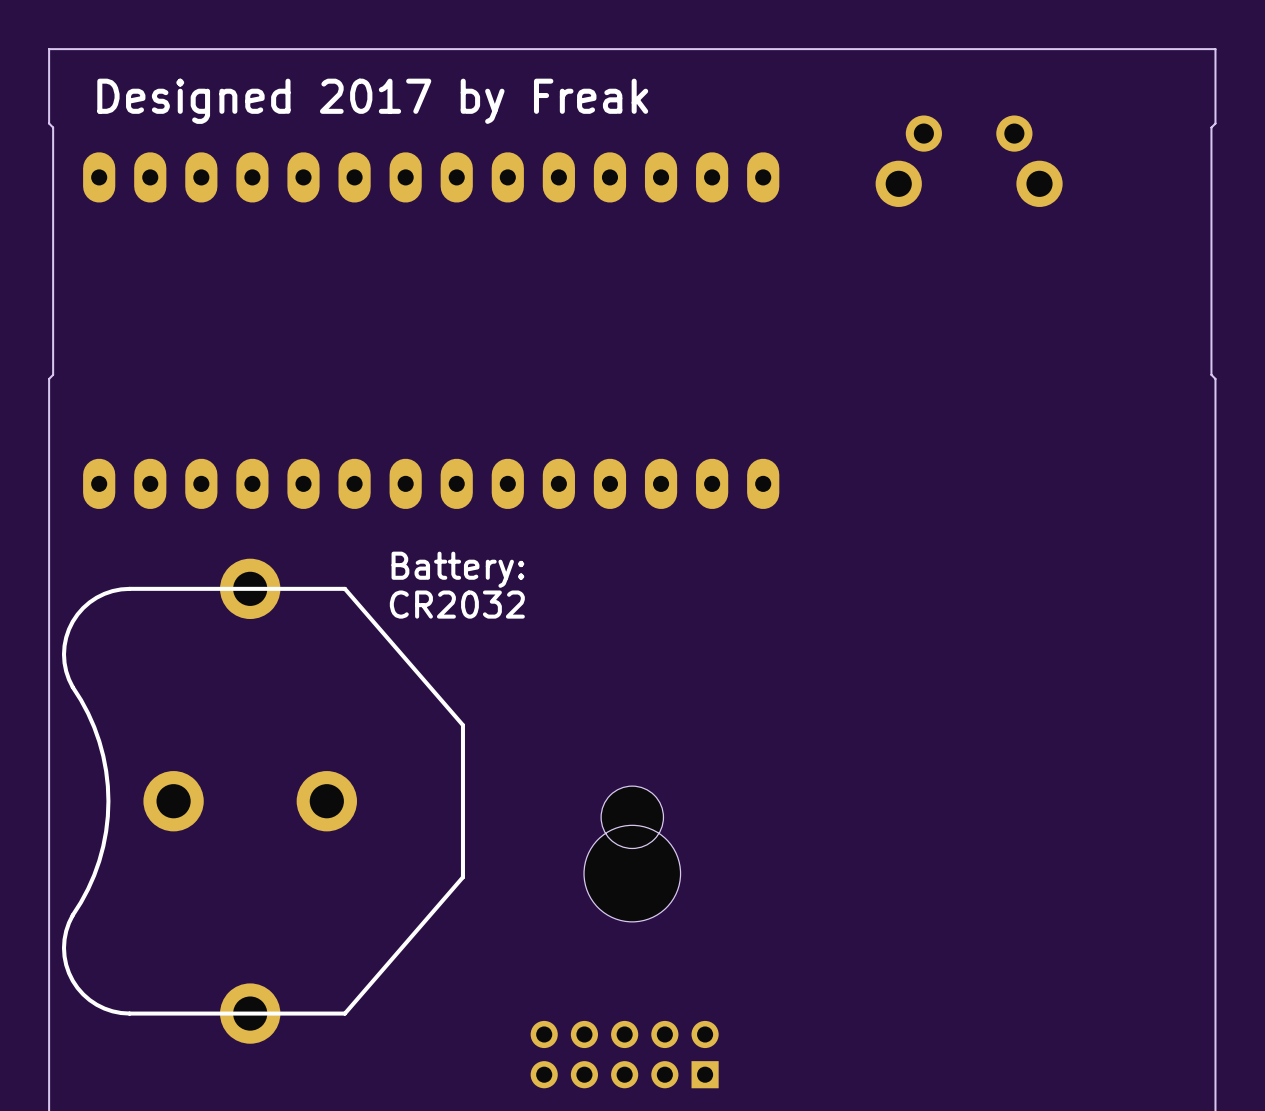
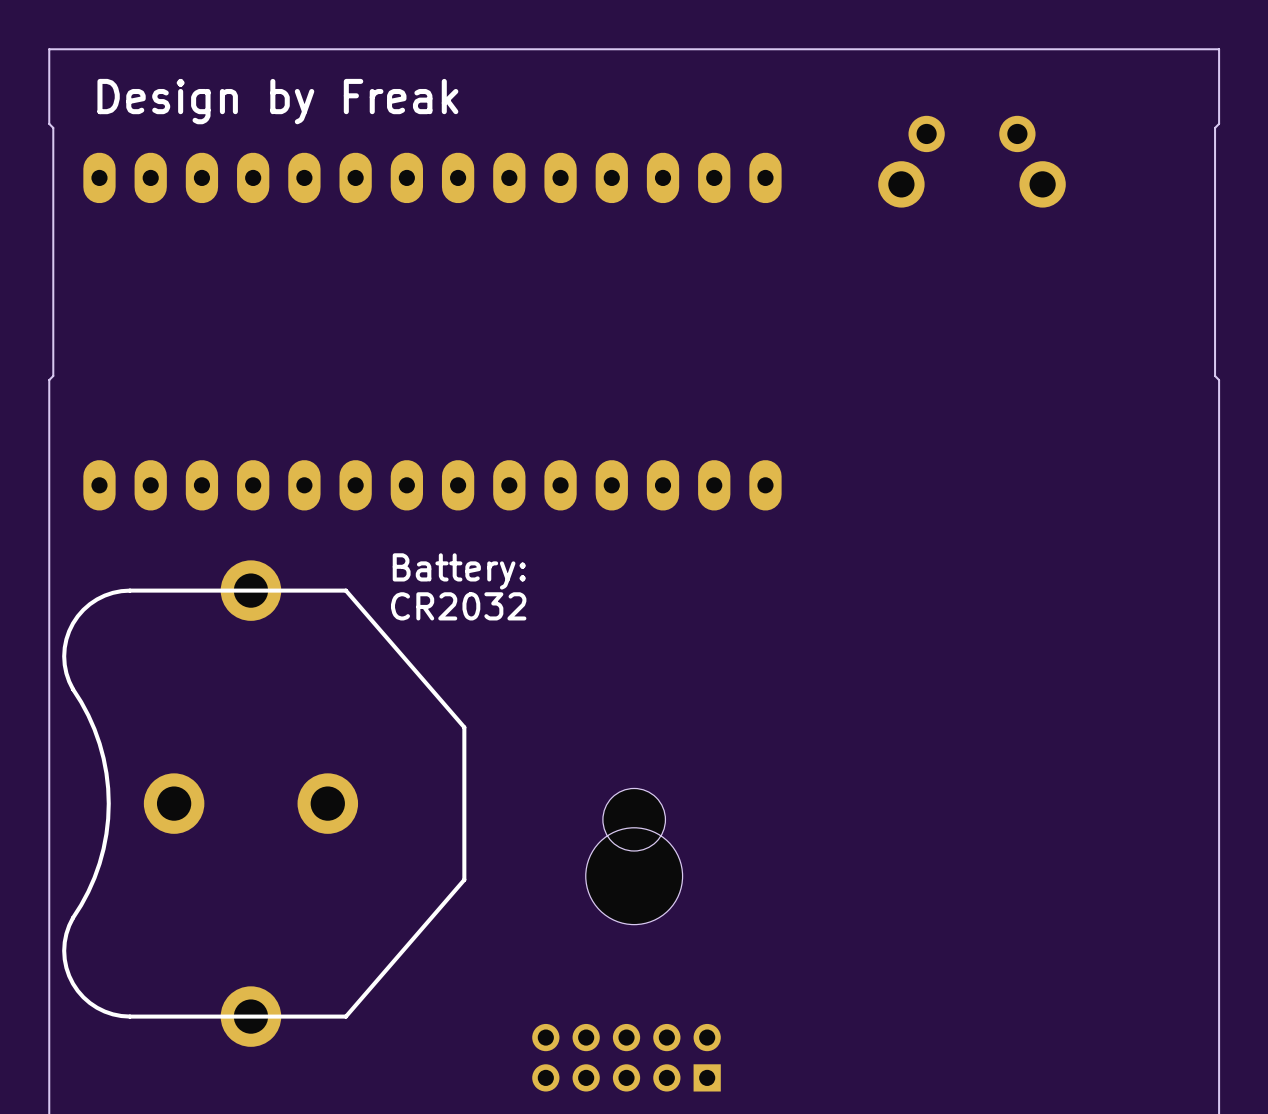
text: Designed 2017 by Freak (372, 101) -> Design by Freak (277, 101)

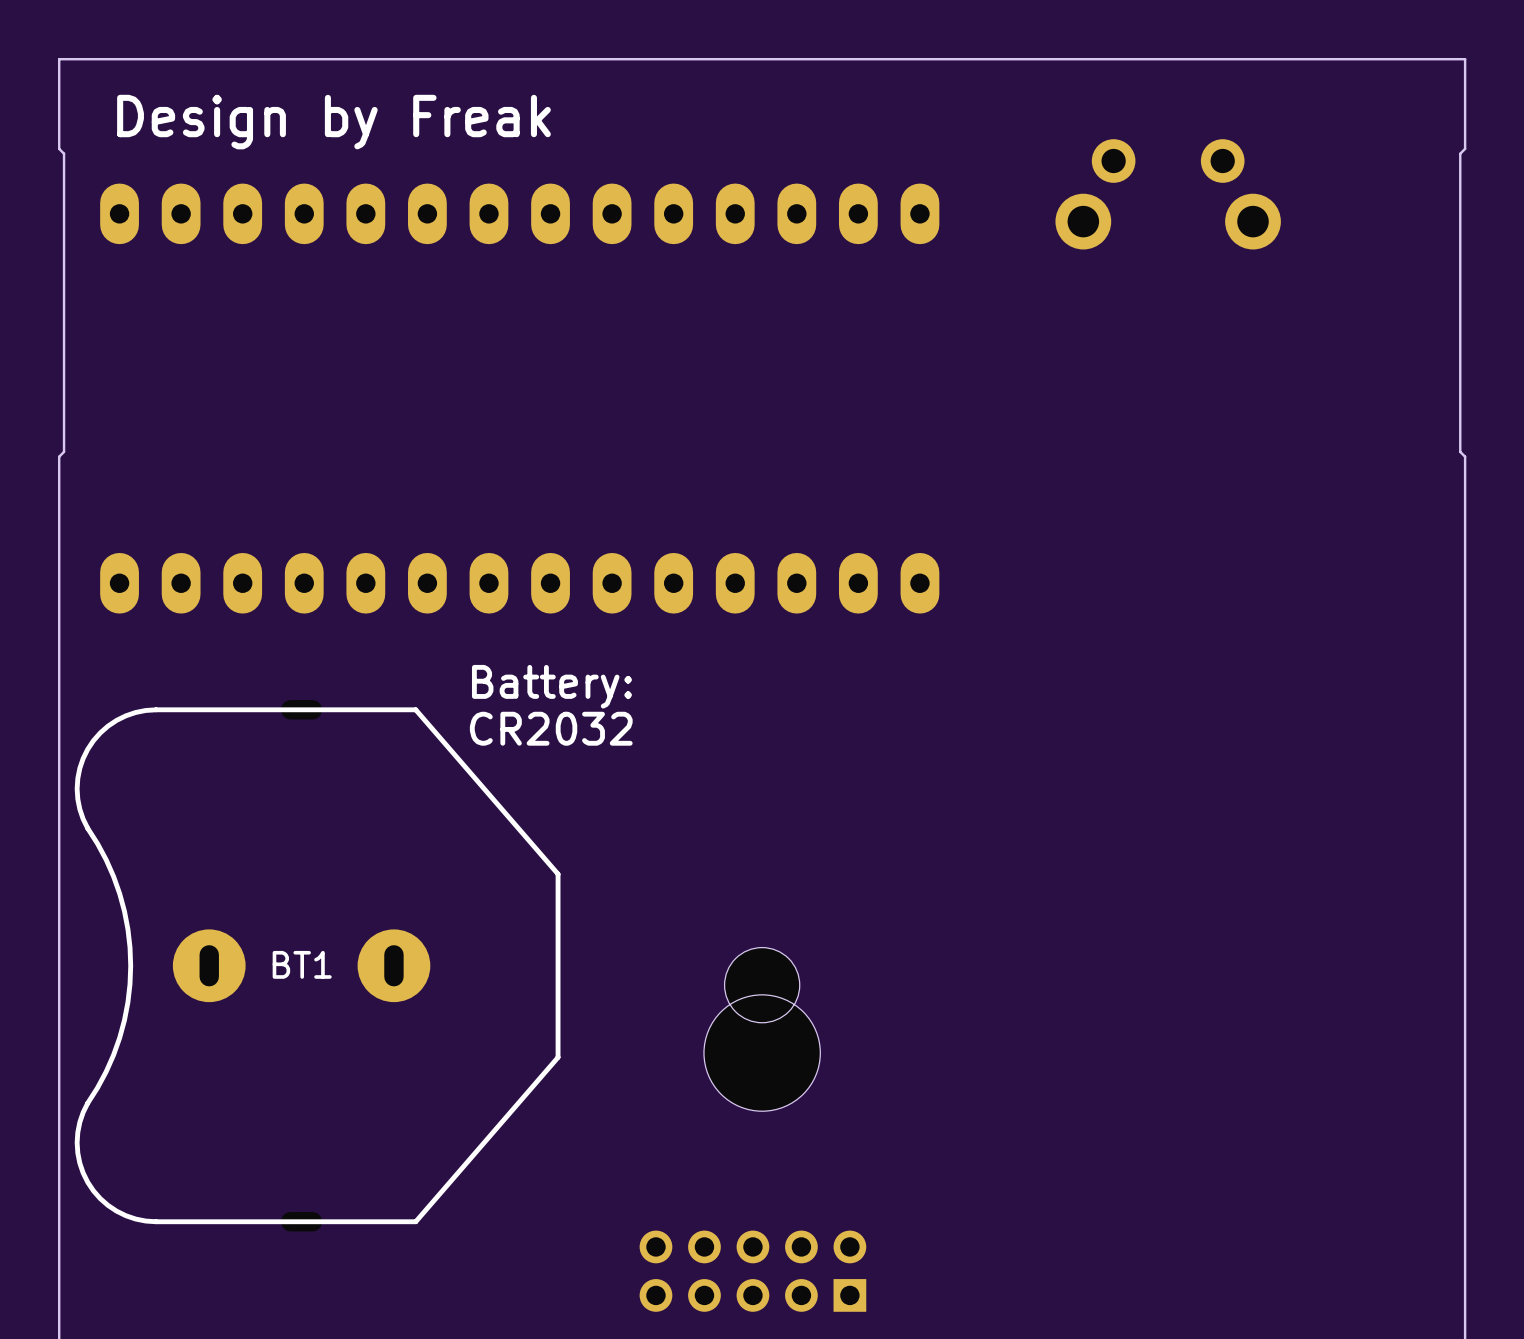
part: none -> (301, 709)
part: (264, 803) -> none
BT1: none -> (317, 965)
part: none -> (301, 1221)

